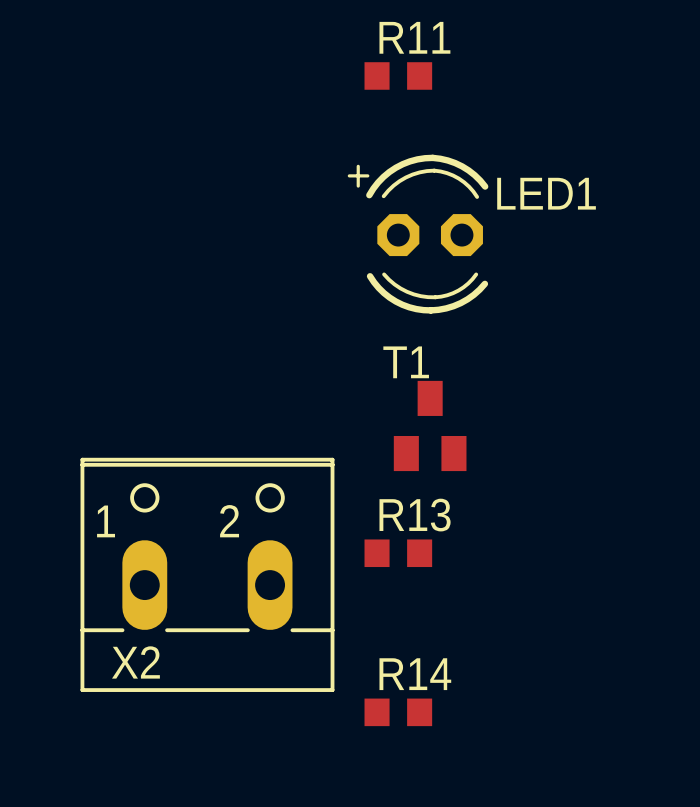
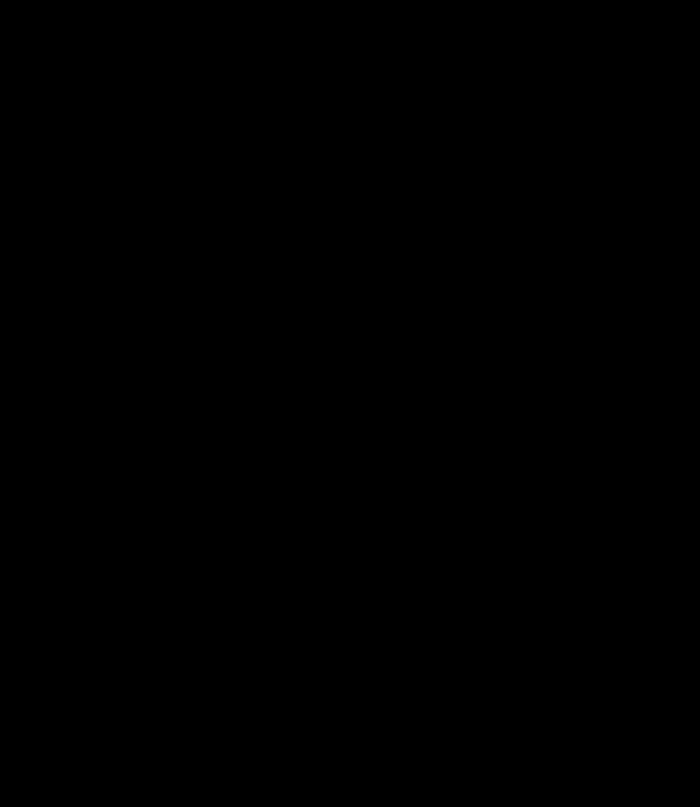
R11: (398, 75) -> none
LED1: (418, 234) -> none
T1: (430, 425) -> none
R13: (398, 553) -> none
X2: (207, 574) -> none
R14: (398, 712) -> none

